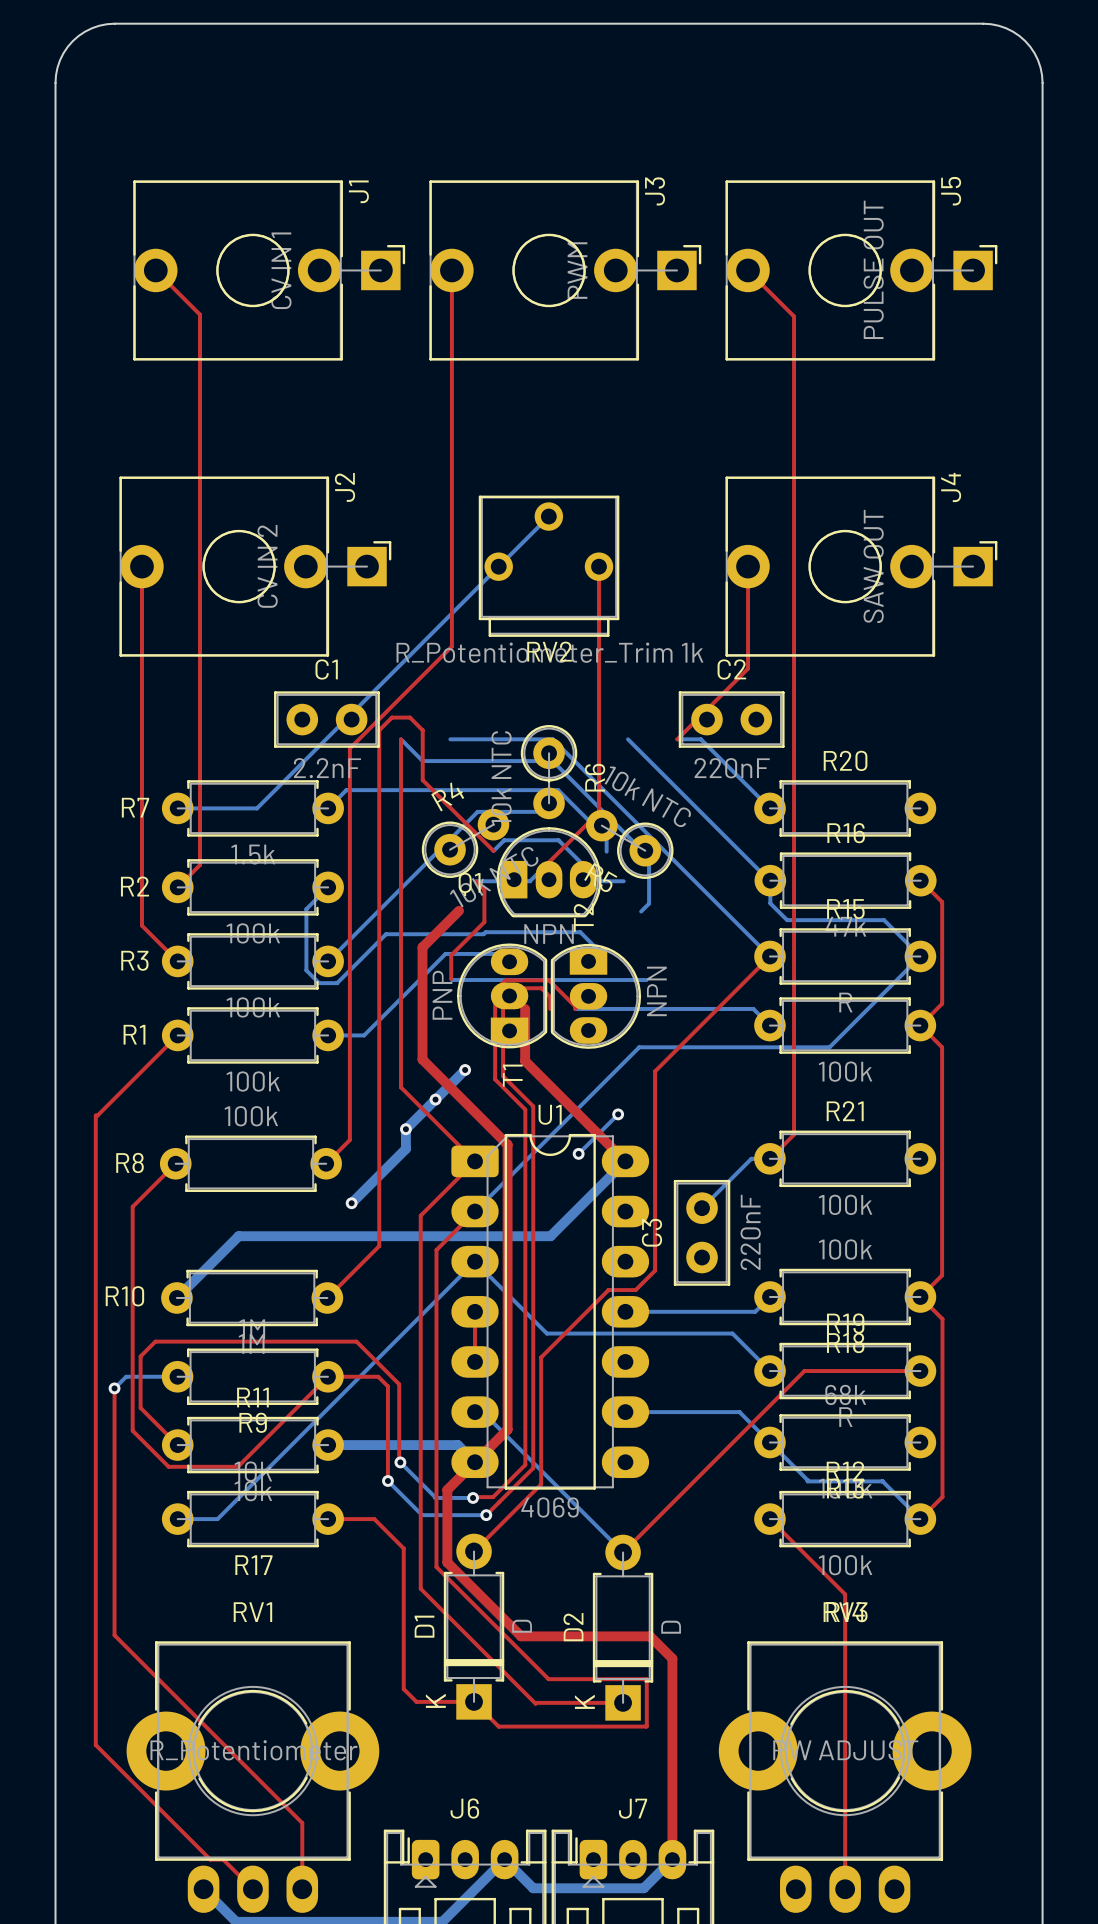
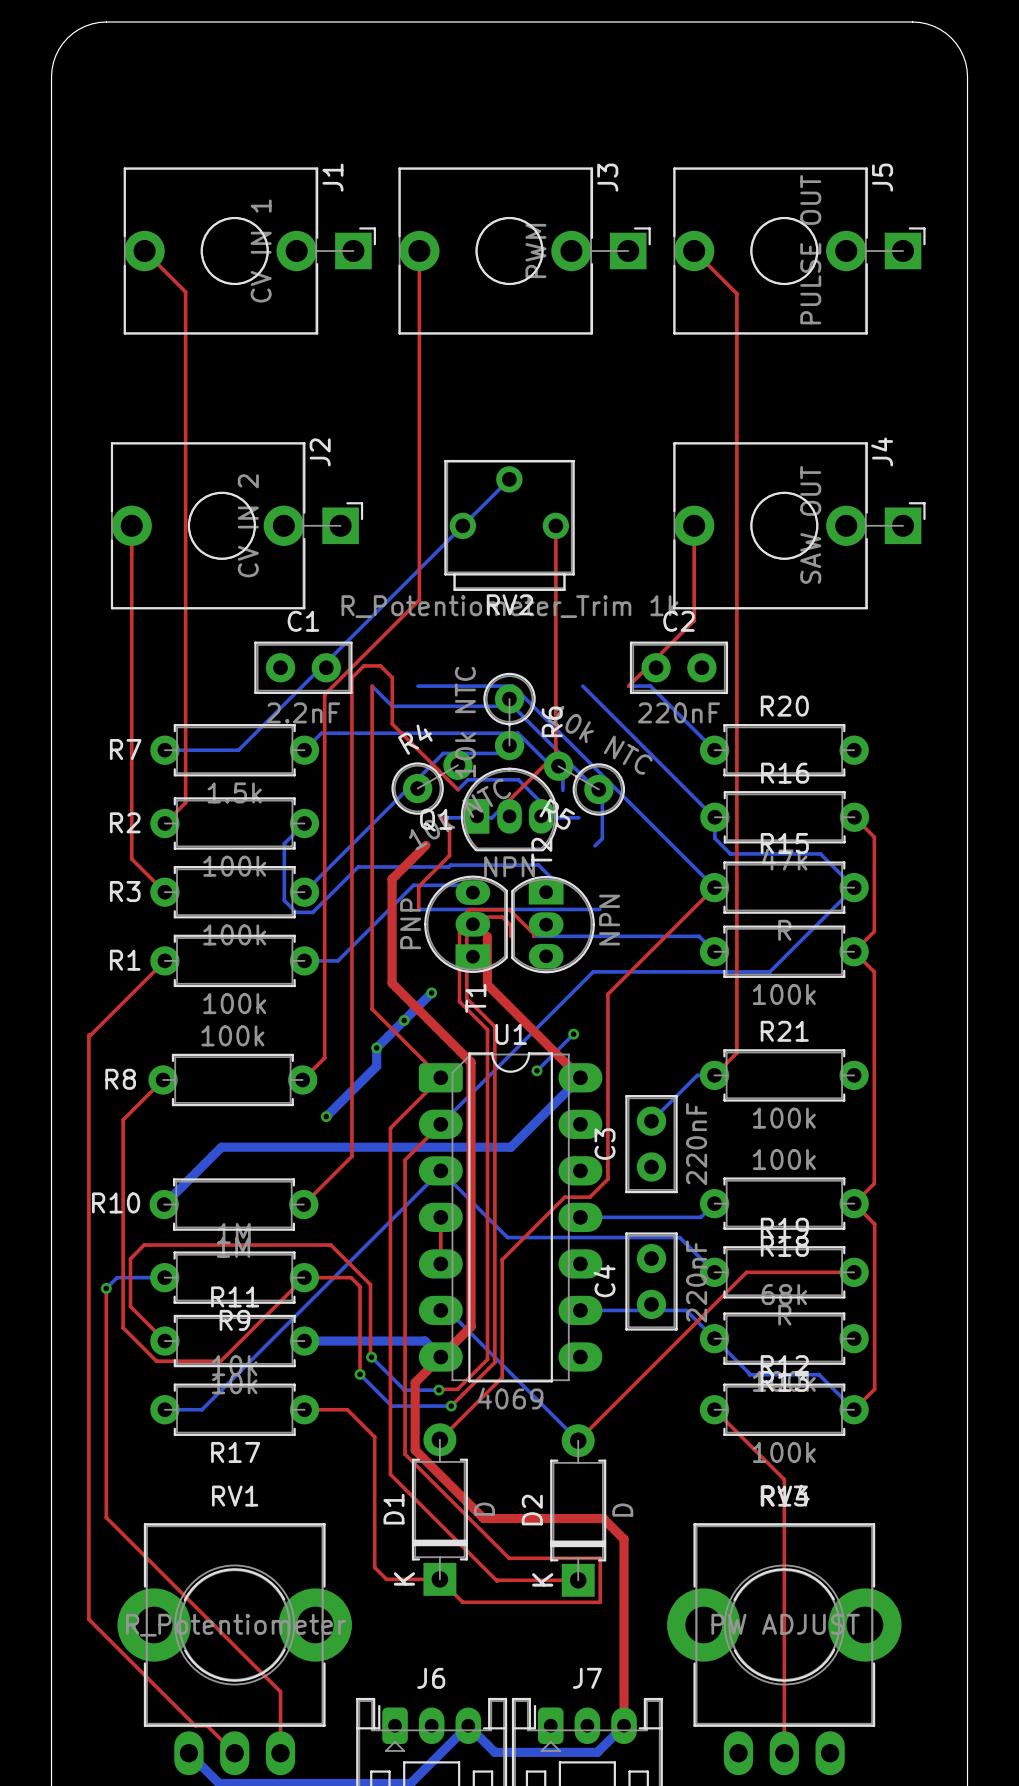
C4: none -> 220nF (651, 1281)

